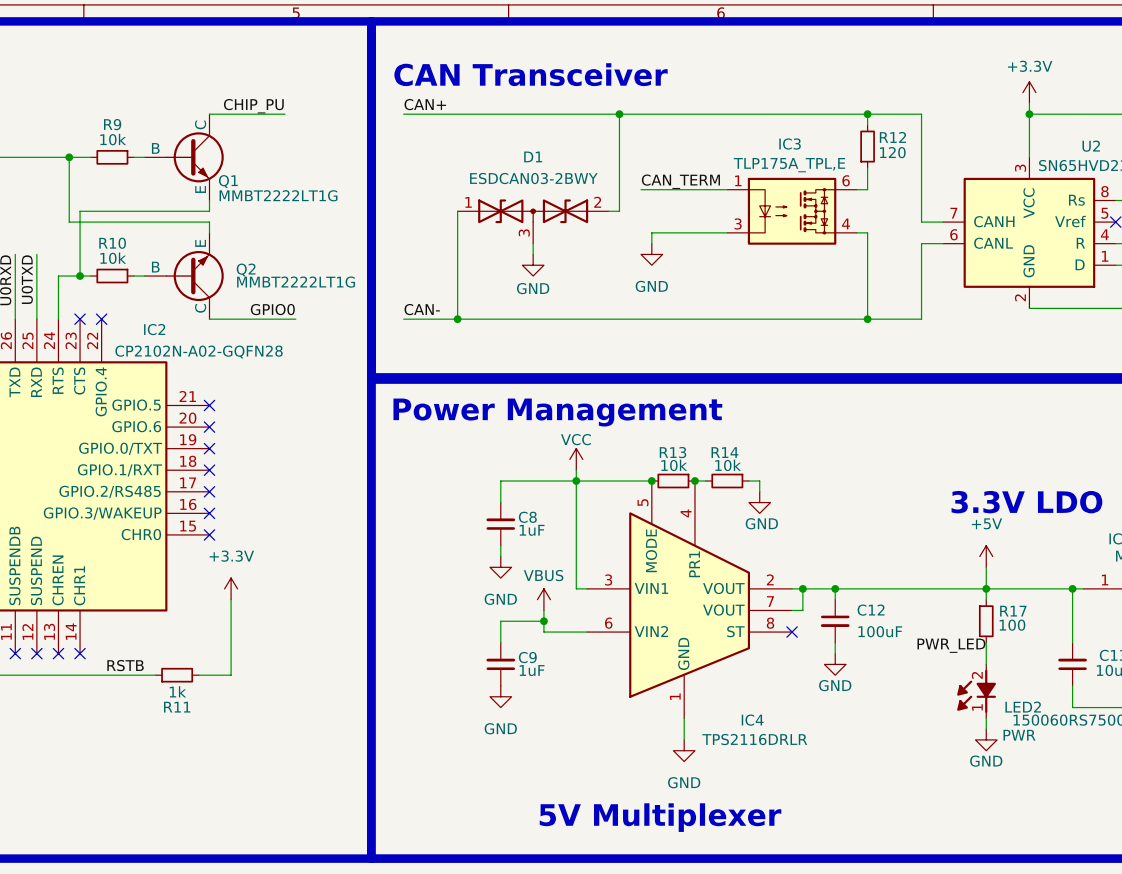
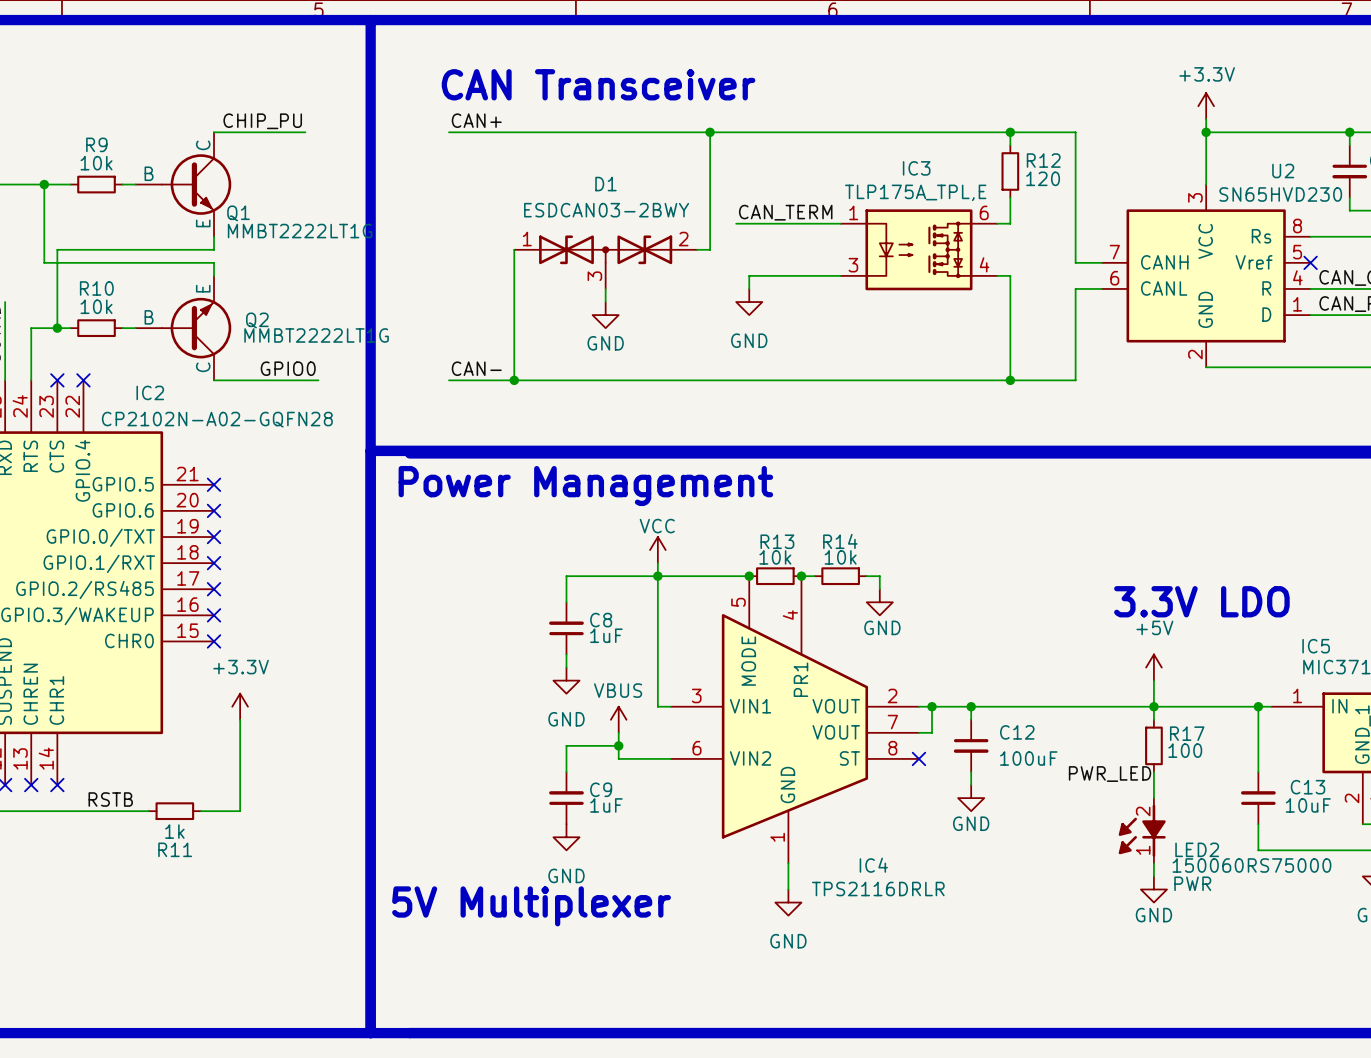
line: (371, 21) (371, 858) (371, 377) -> (370, 20) (370, 1033) (370, 450) (409, 450)
text position: Power Management (557, 412) -> Power Management (585, 485)
text position: 5V Multiplexer (660, 817) -> 5V Multiplexer (531, 906)

